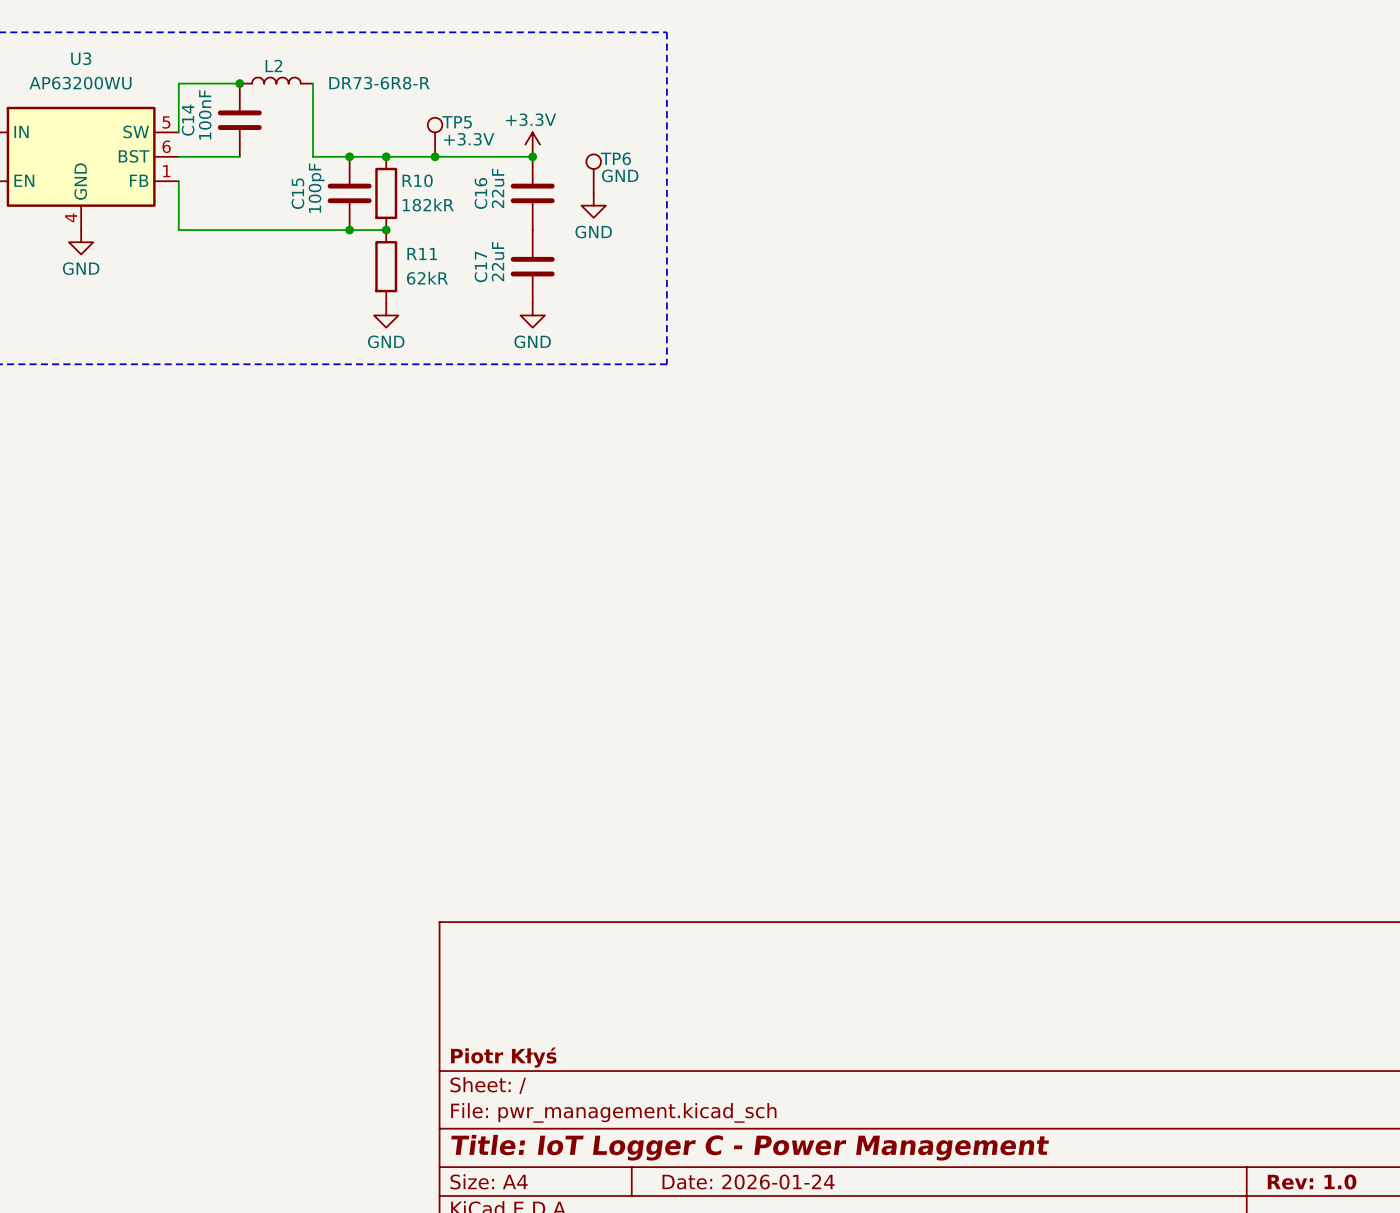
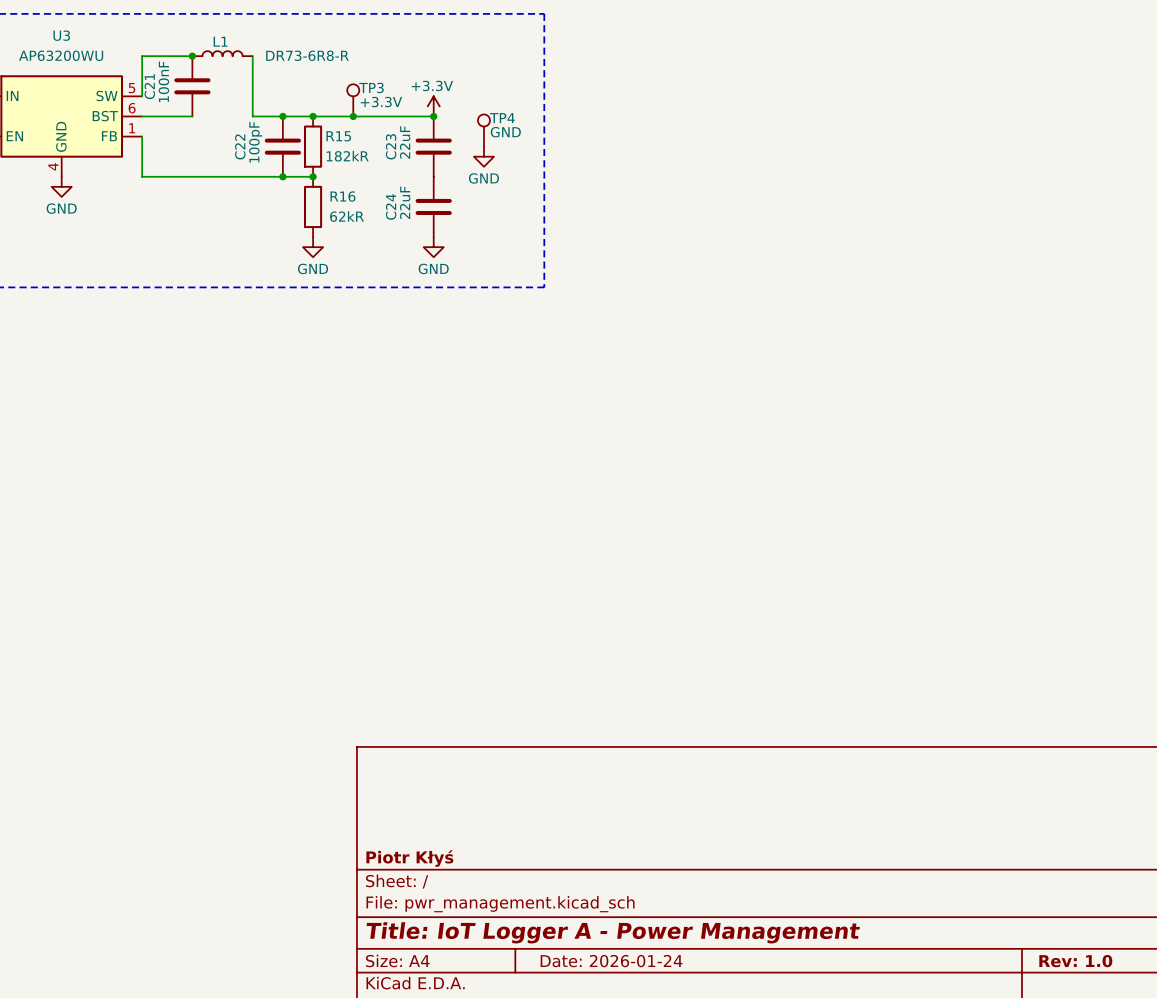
L2 name: L2 (273, 65) -> L1 (220, 41)
C14 name: C14 (188, 120) -> C21 (149, 86)
TP5 name: TP5 (457, 122) -> TP3 (371, 87)
TP6 name: TP6 (615, 158) -> TP4 (502, 118)
R10 name: R10 (417, 180) -> R15 (338, 136)
C15 name: C15 (297, 193) -> C22 (240, 146)
C16 name: C16 (480, 193) -> C23 (391, 146)
R11 name: R11 (422, 253) -> R16 (342, 196)
C17 name: C17 (480, 266) -> C24 (391, 206)
title block: Title: IoT Logger C - Power Management (750, 1147) -> Title: IoT Logger A - Power Management (613, 932)

